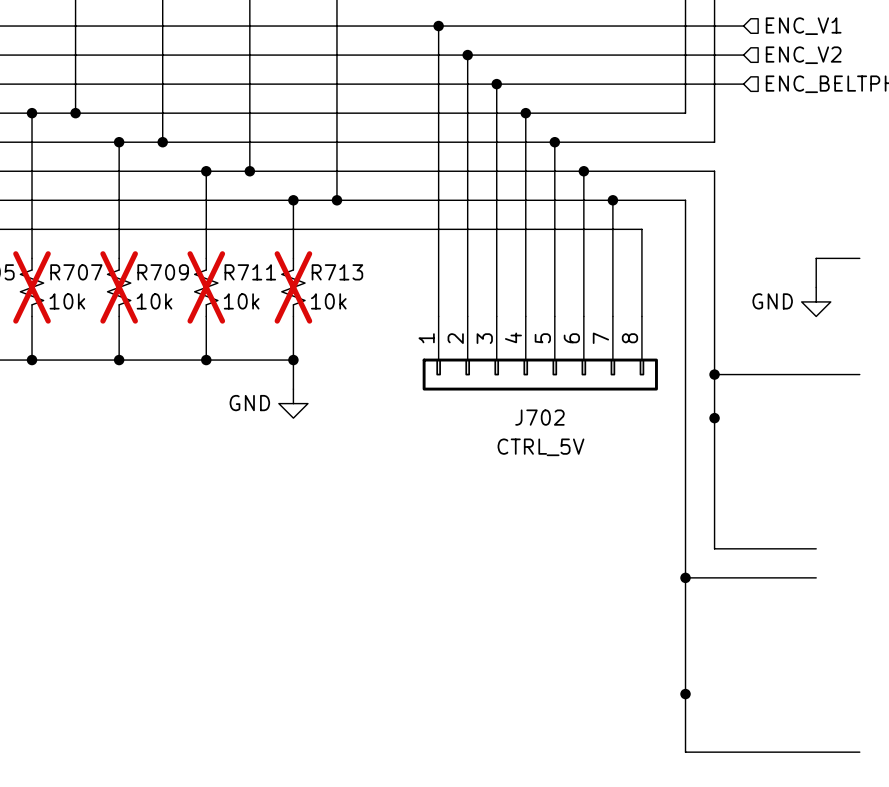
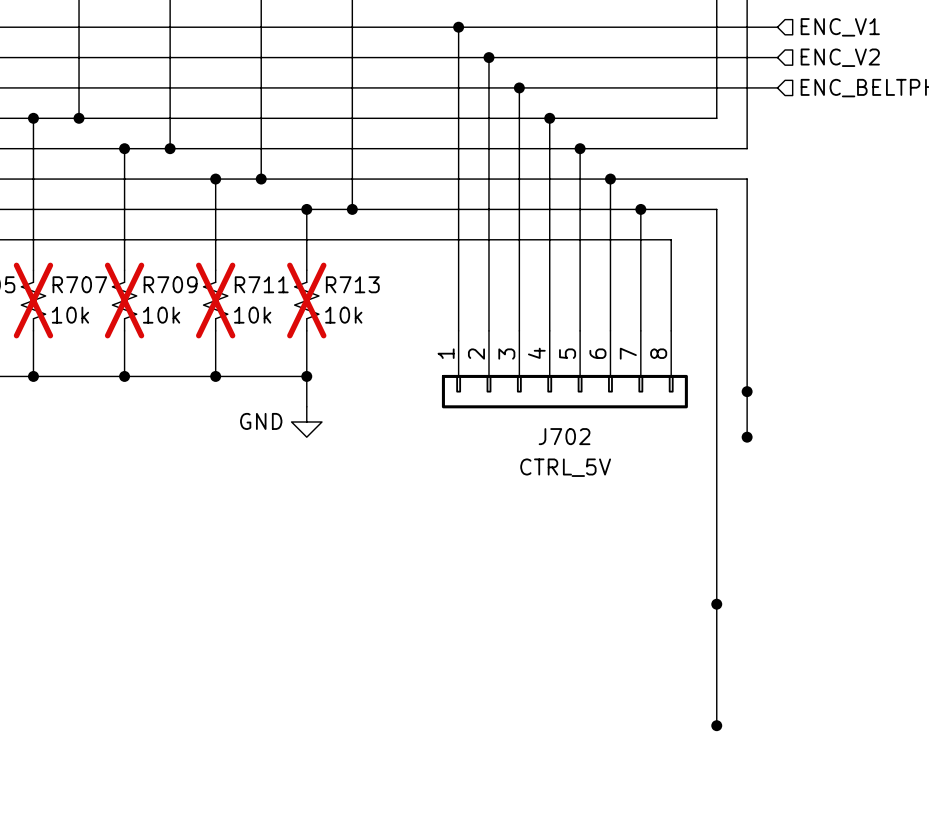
wire: (859, 258) (816, 258) (816, 287) -> none
power symbol: GND (816, 301) -> none
wire: (714, 374) (859, 374) -> none
wire: (714, 418) (714, 548) (816, 548) -> none
wire: (685, 577) (816, 577) -> none
wire: (685, 694) (685, 752) (859, 752) -> none

